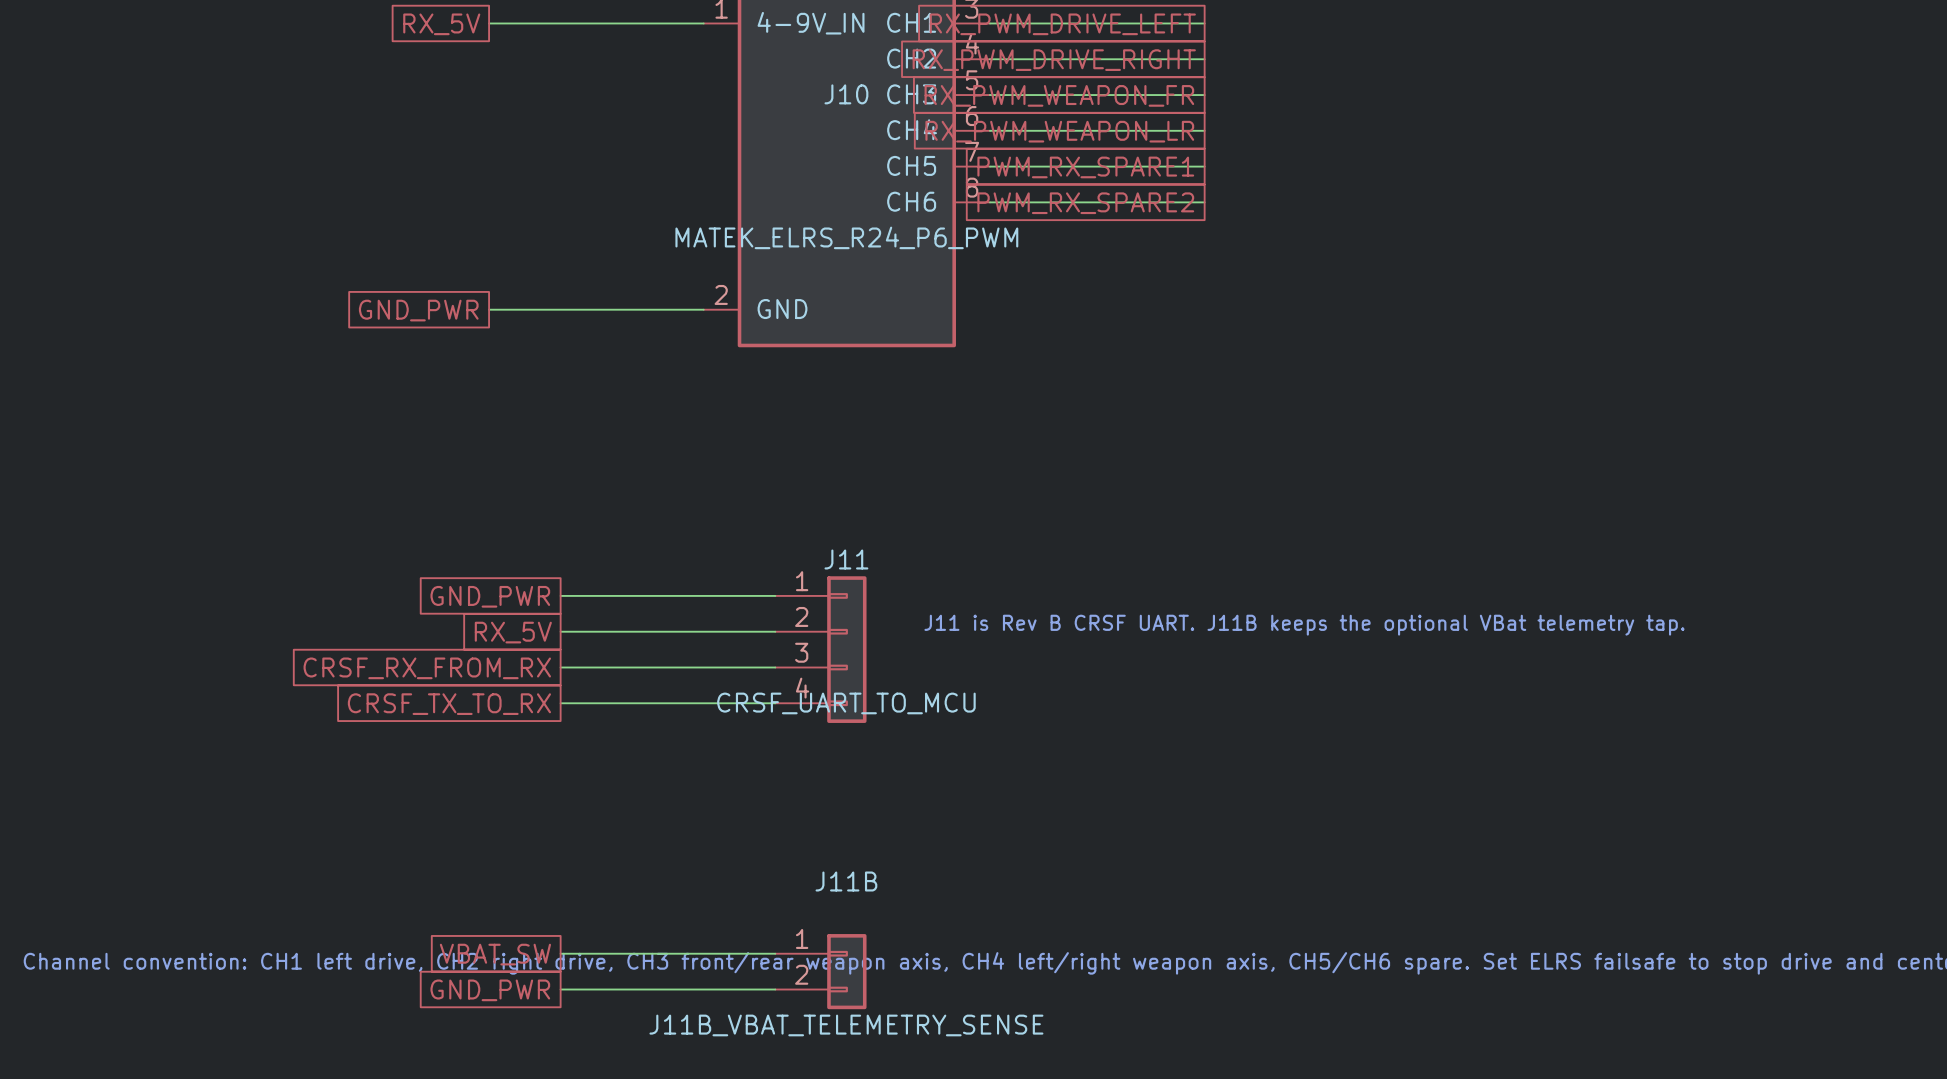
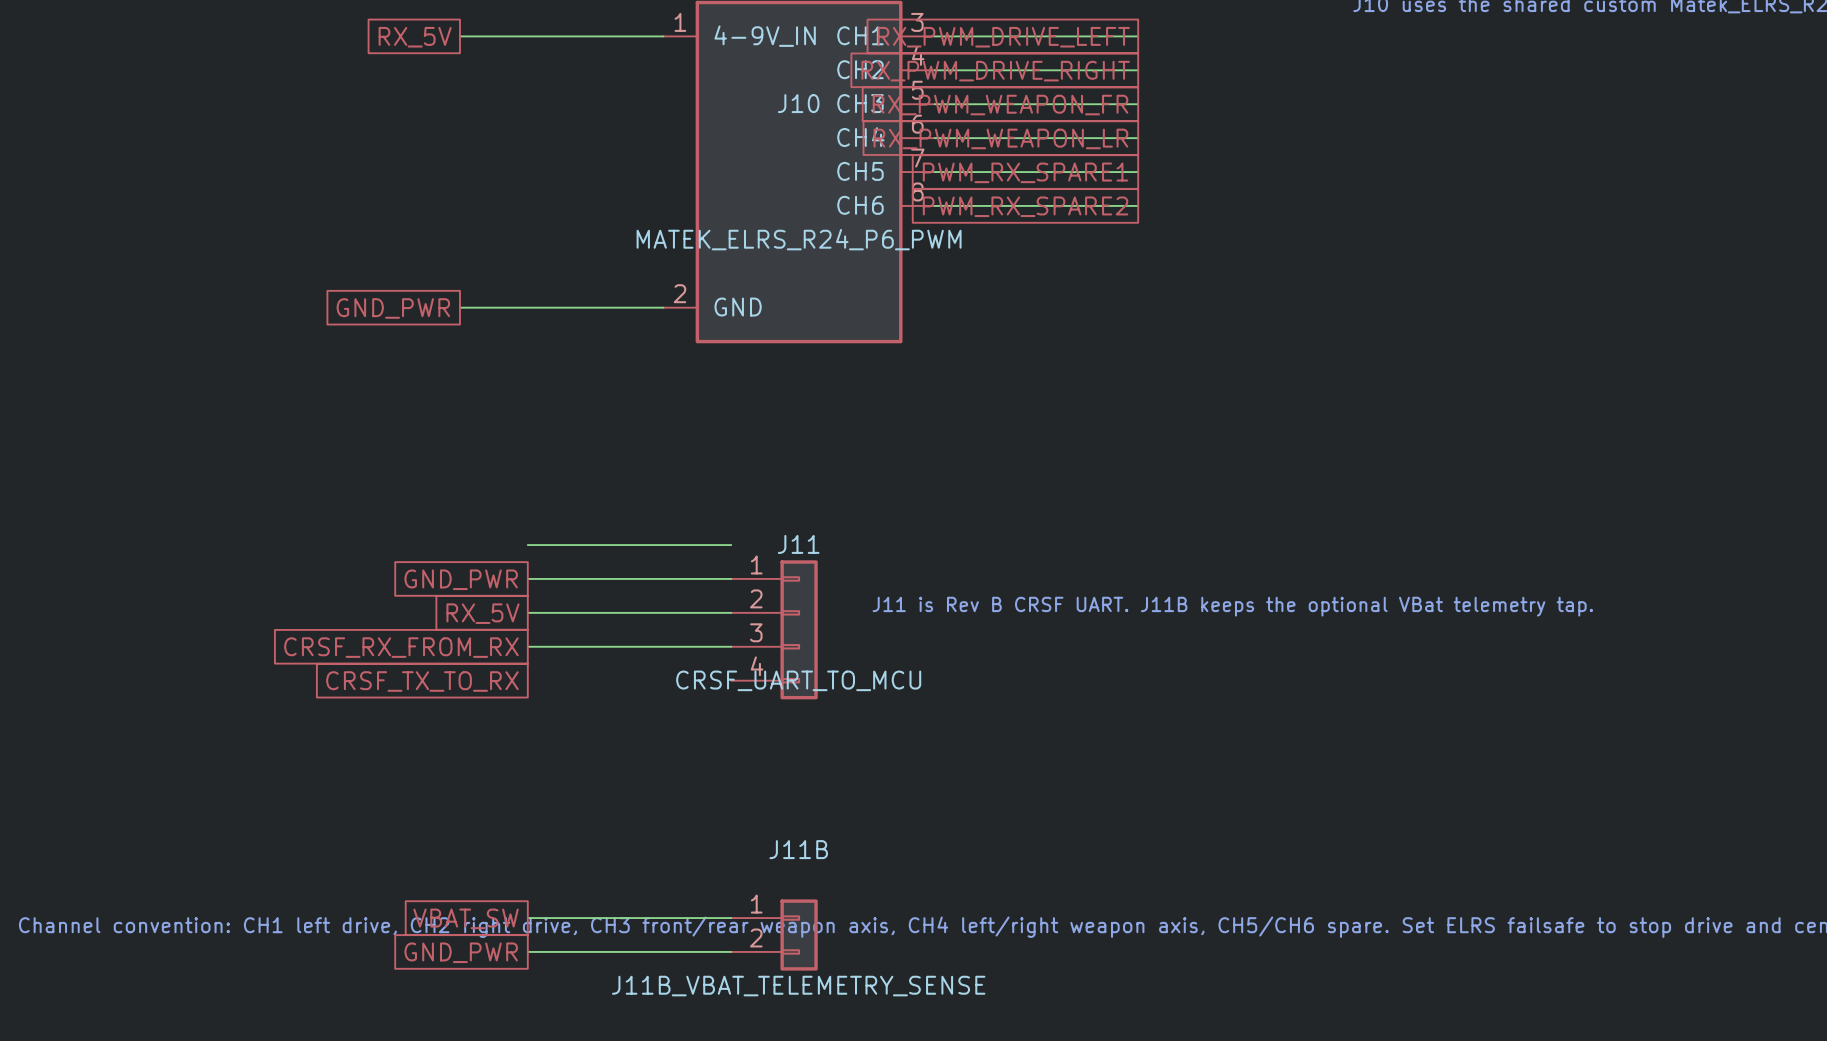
wire: (560, 703) (775, 703) -> (527, 545) (731, 545)

